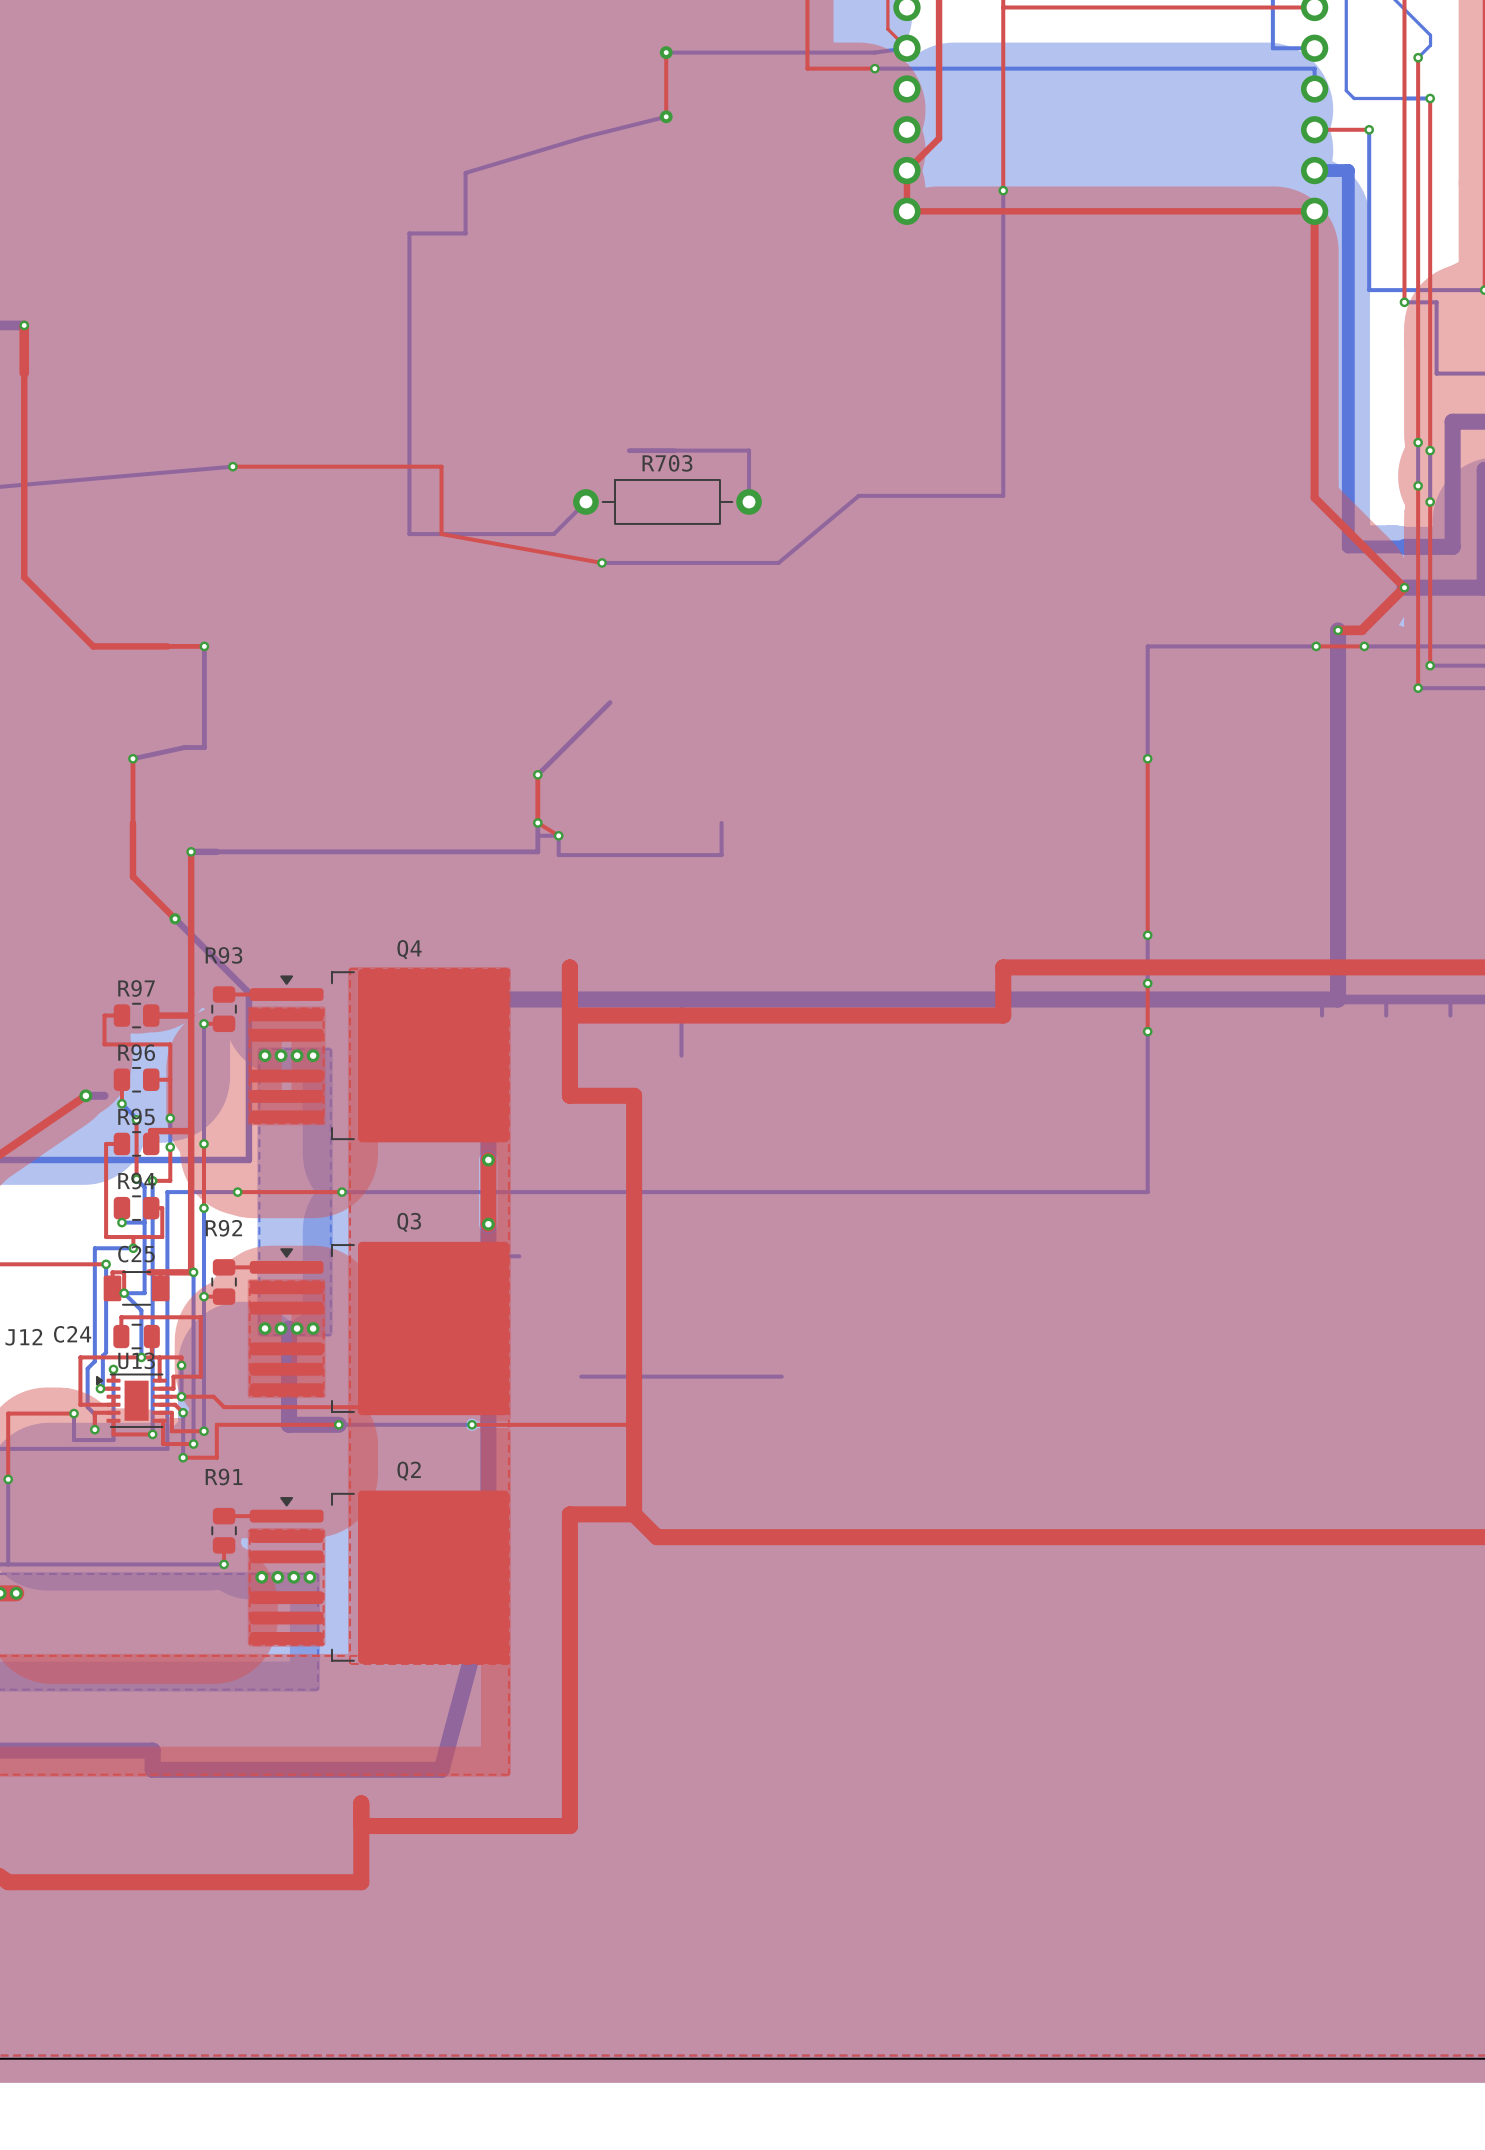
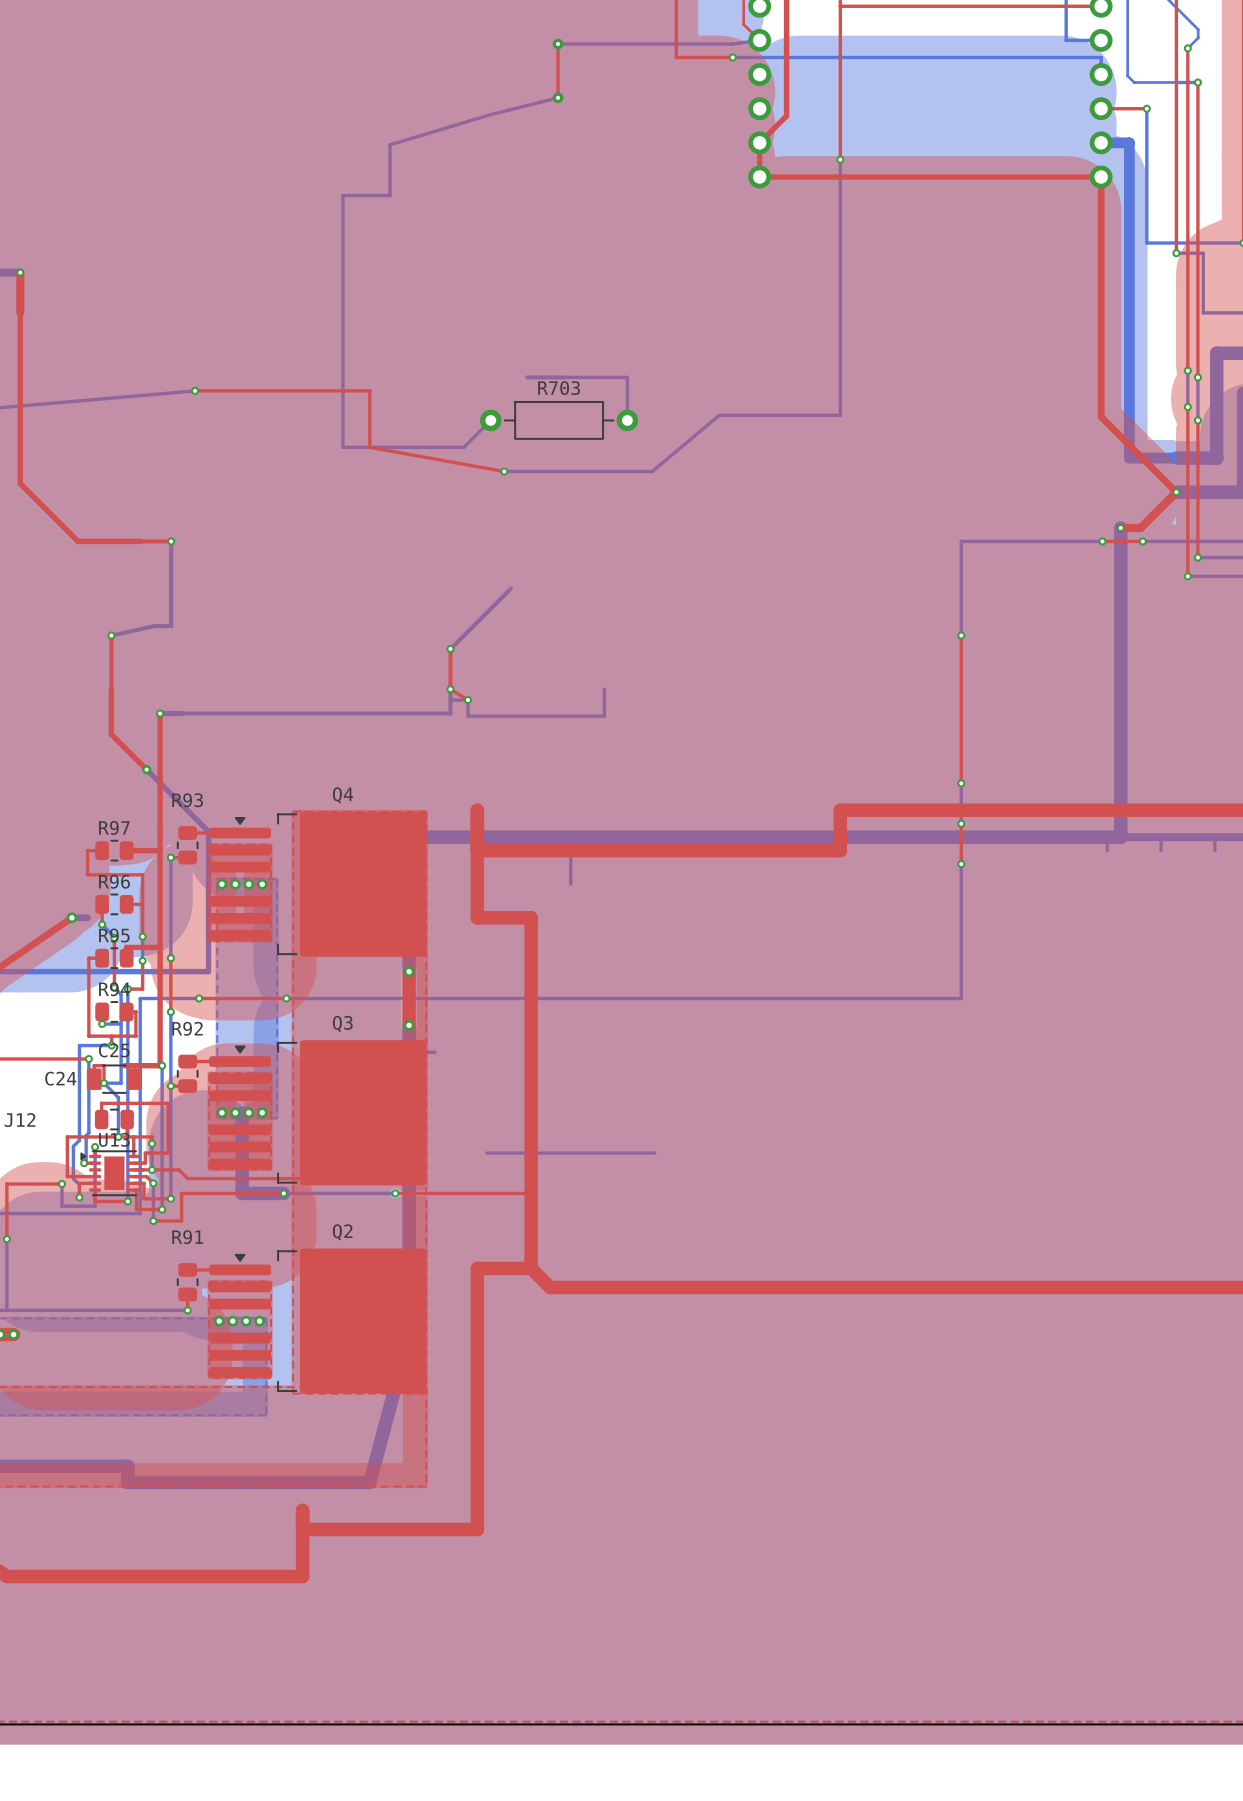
C24 name position: C24 (72, 1334) -> C24 (60, 1078)

